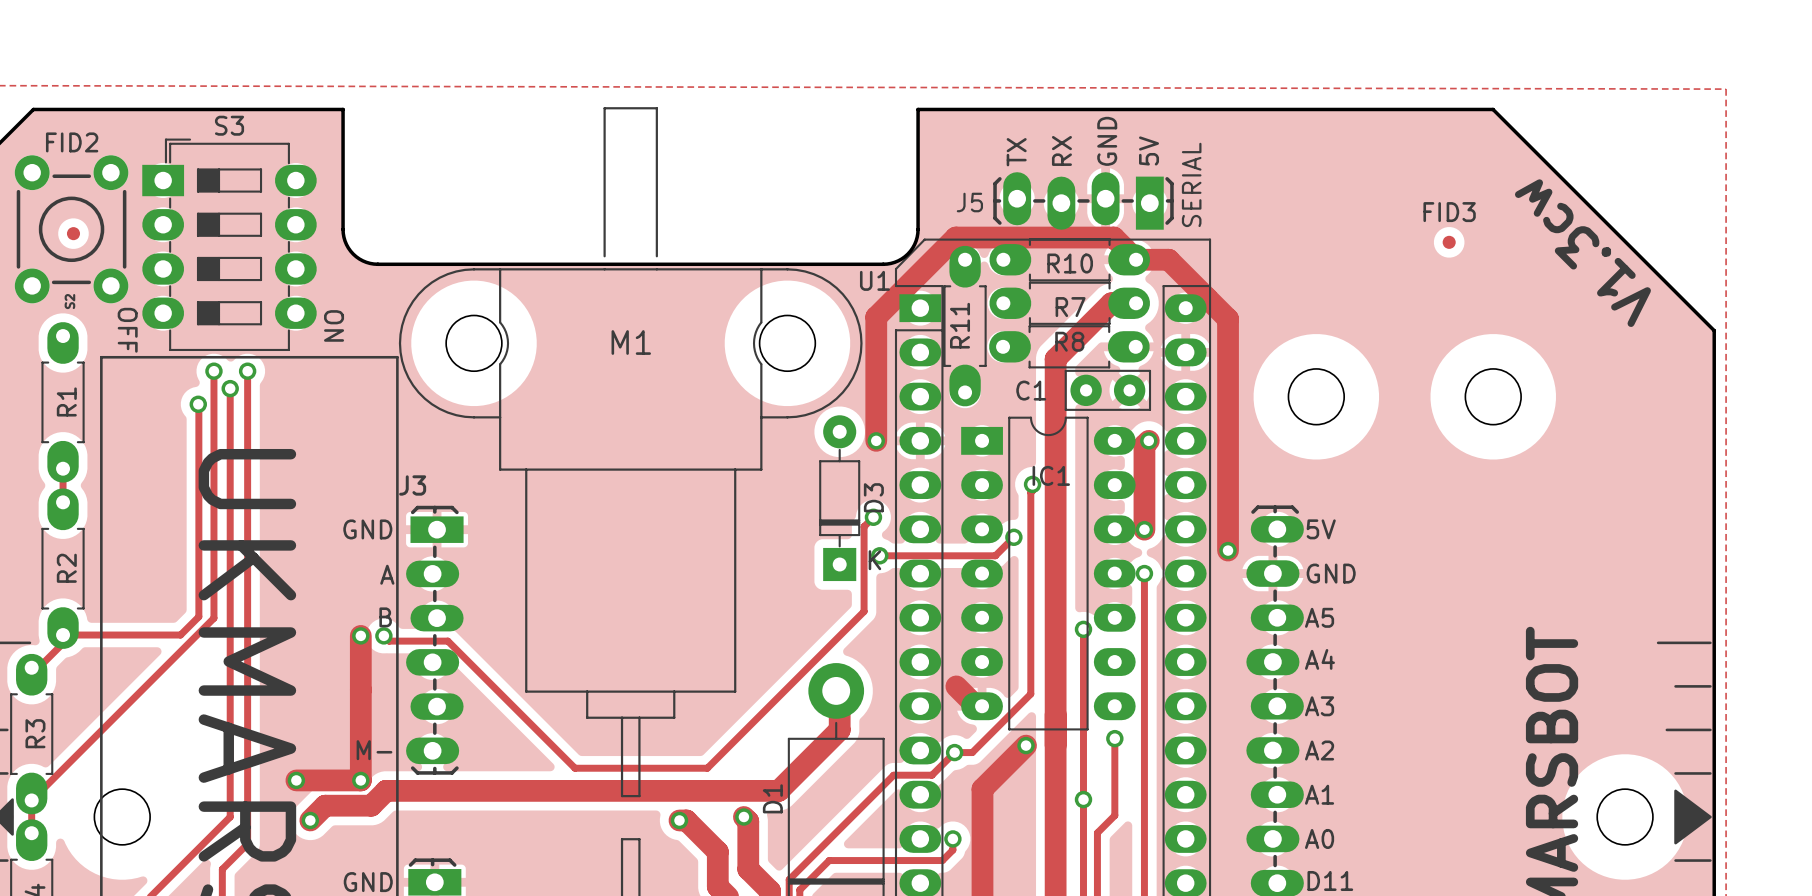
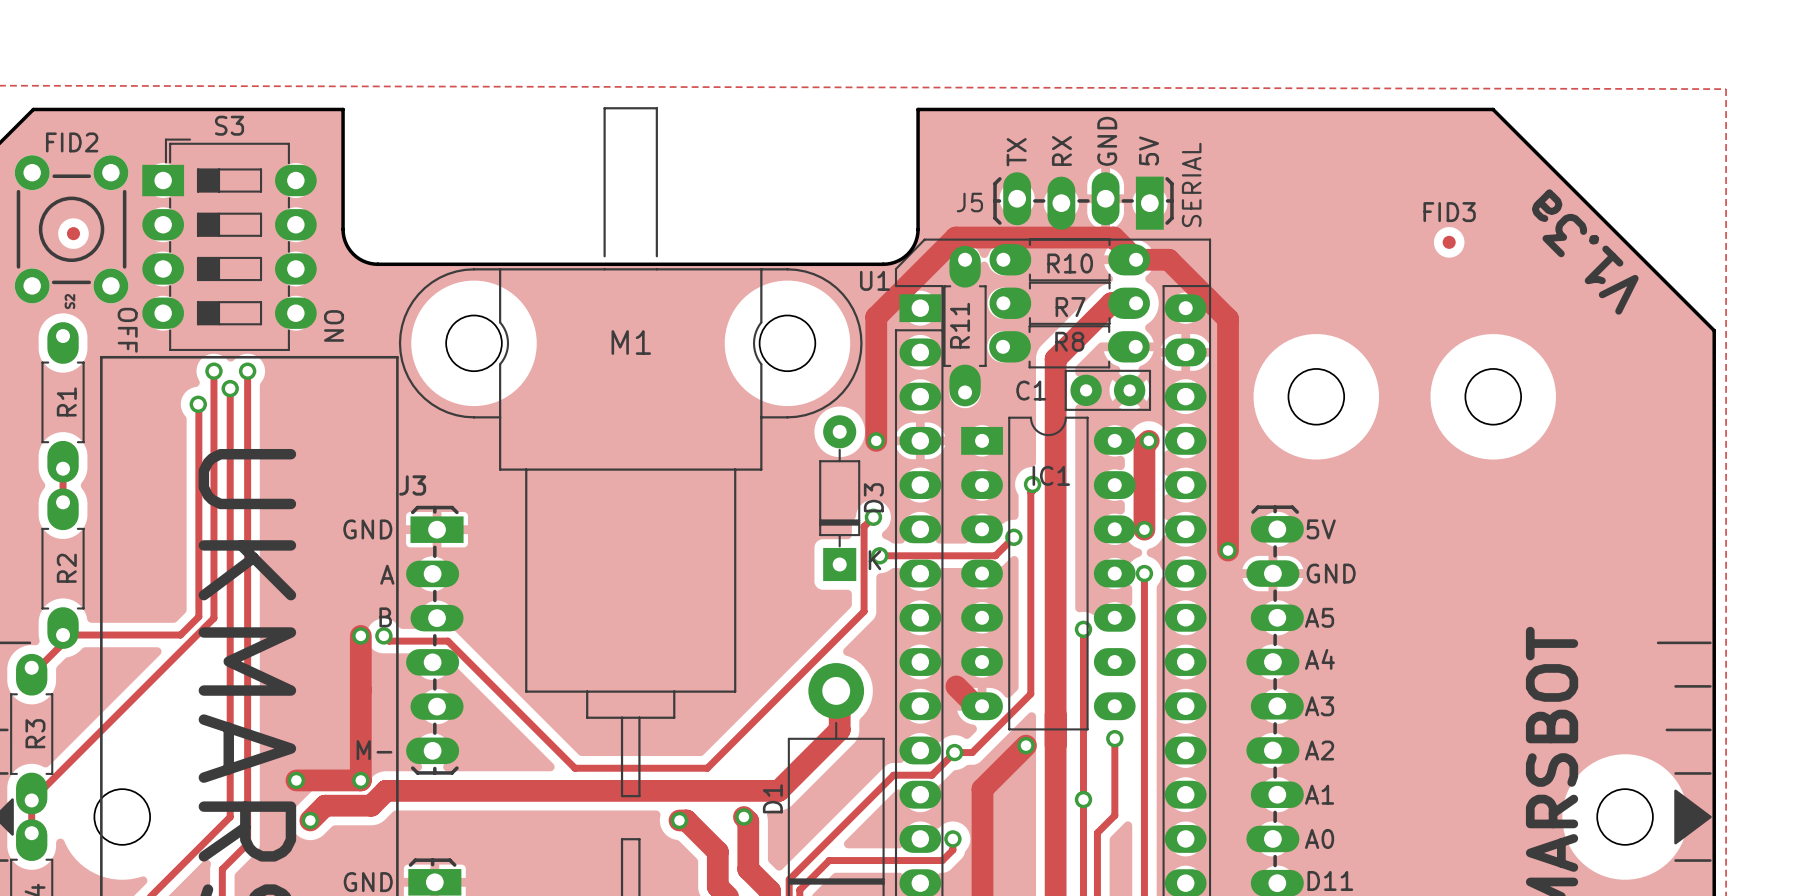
text: V1.3cw (1582, 253) -> V1.3a (1585, 251)

